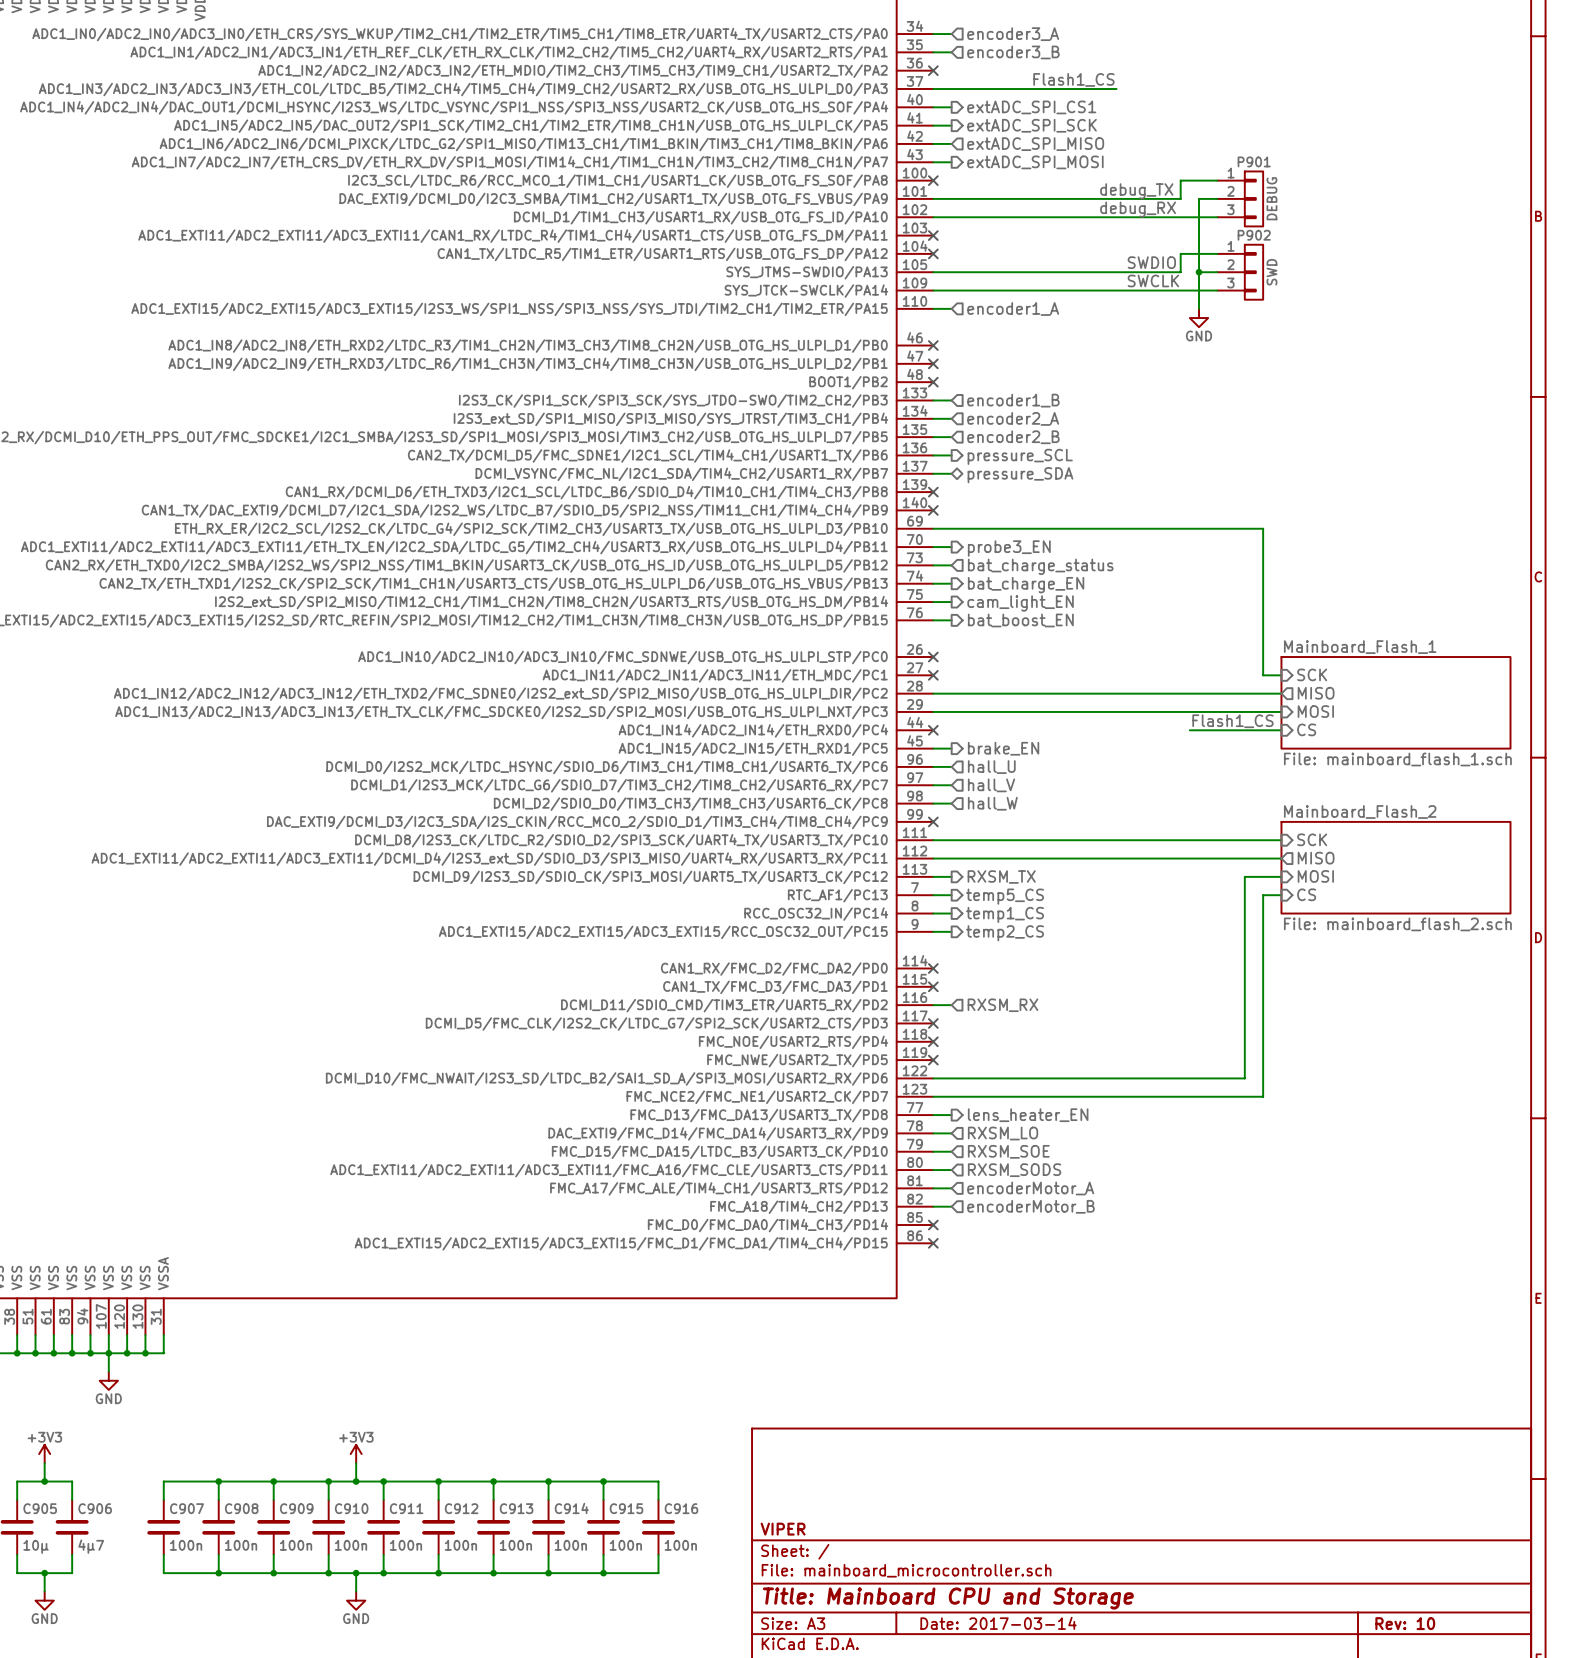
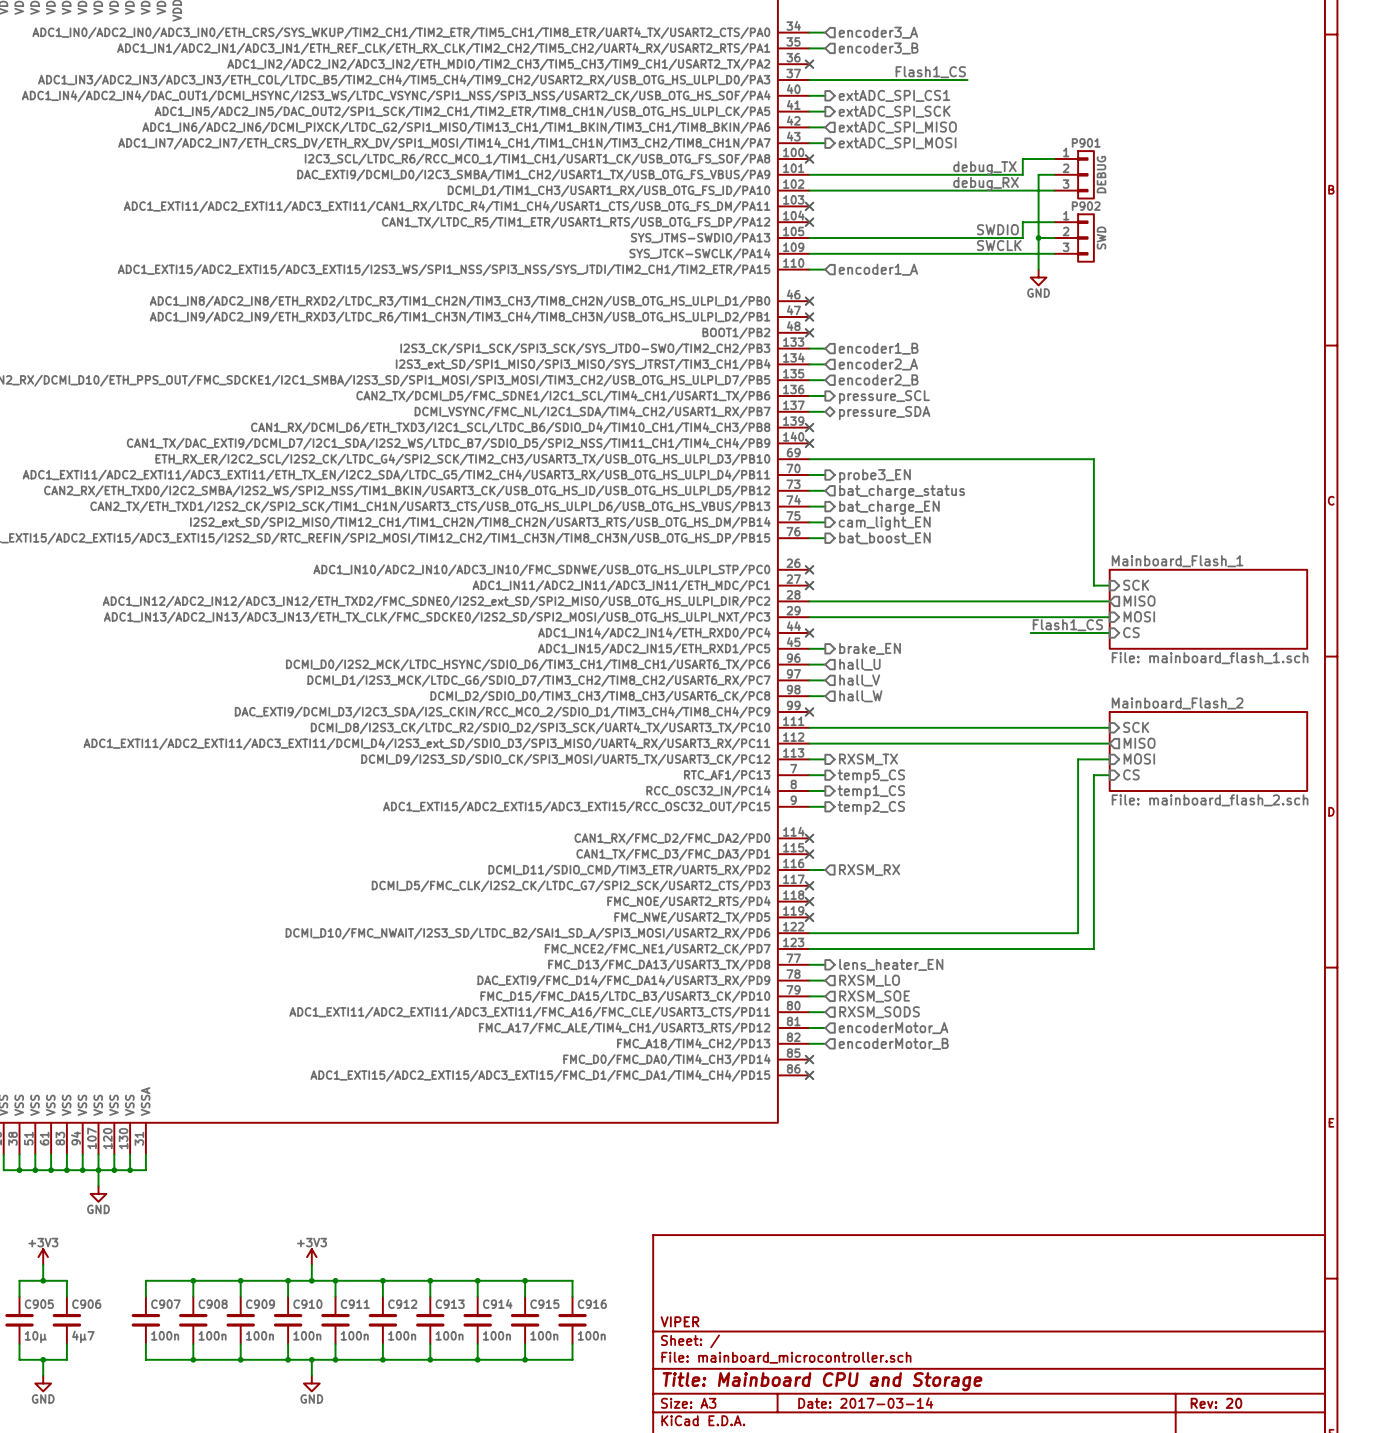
title block: Rev: 10 (1405, 1623) -> Rev: 20 (1216, 1403)

